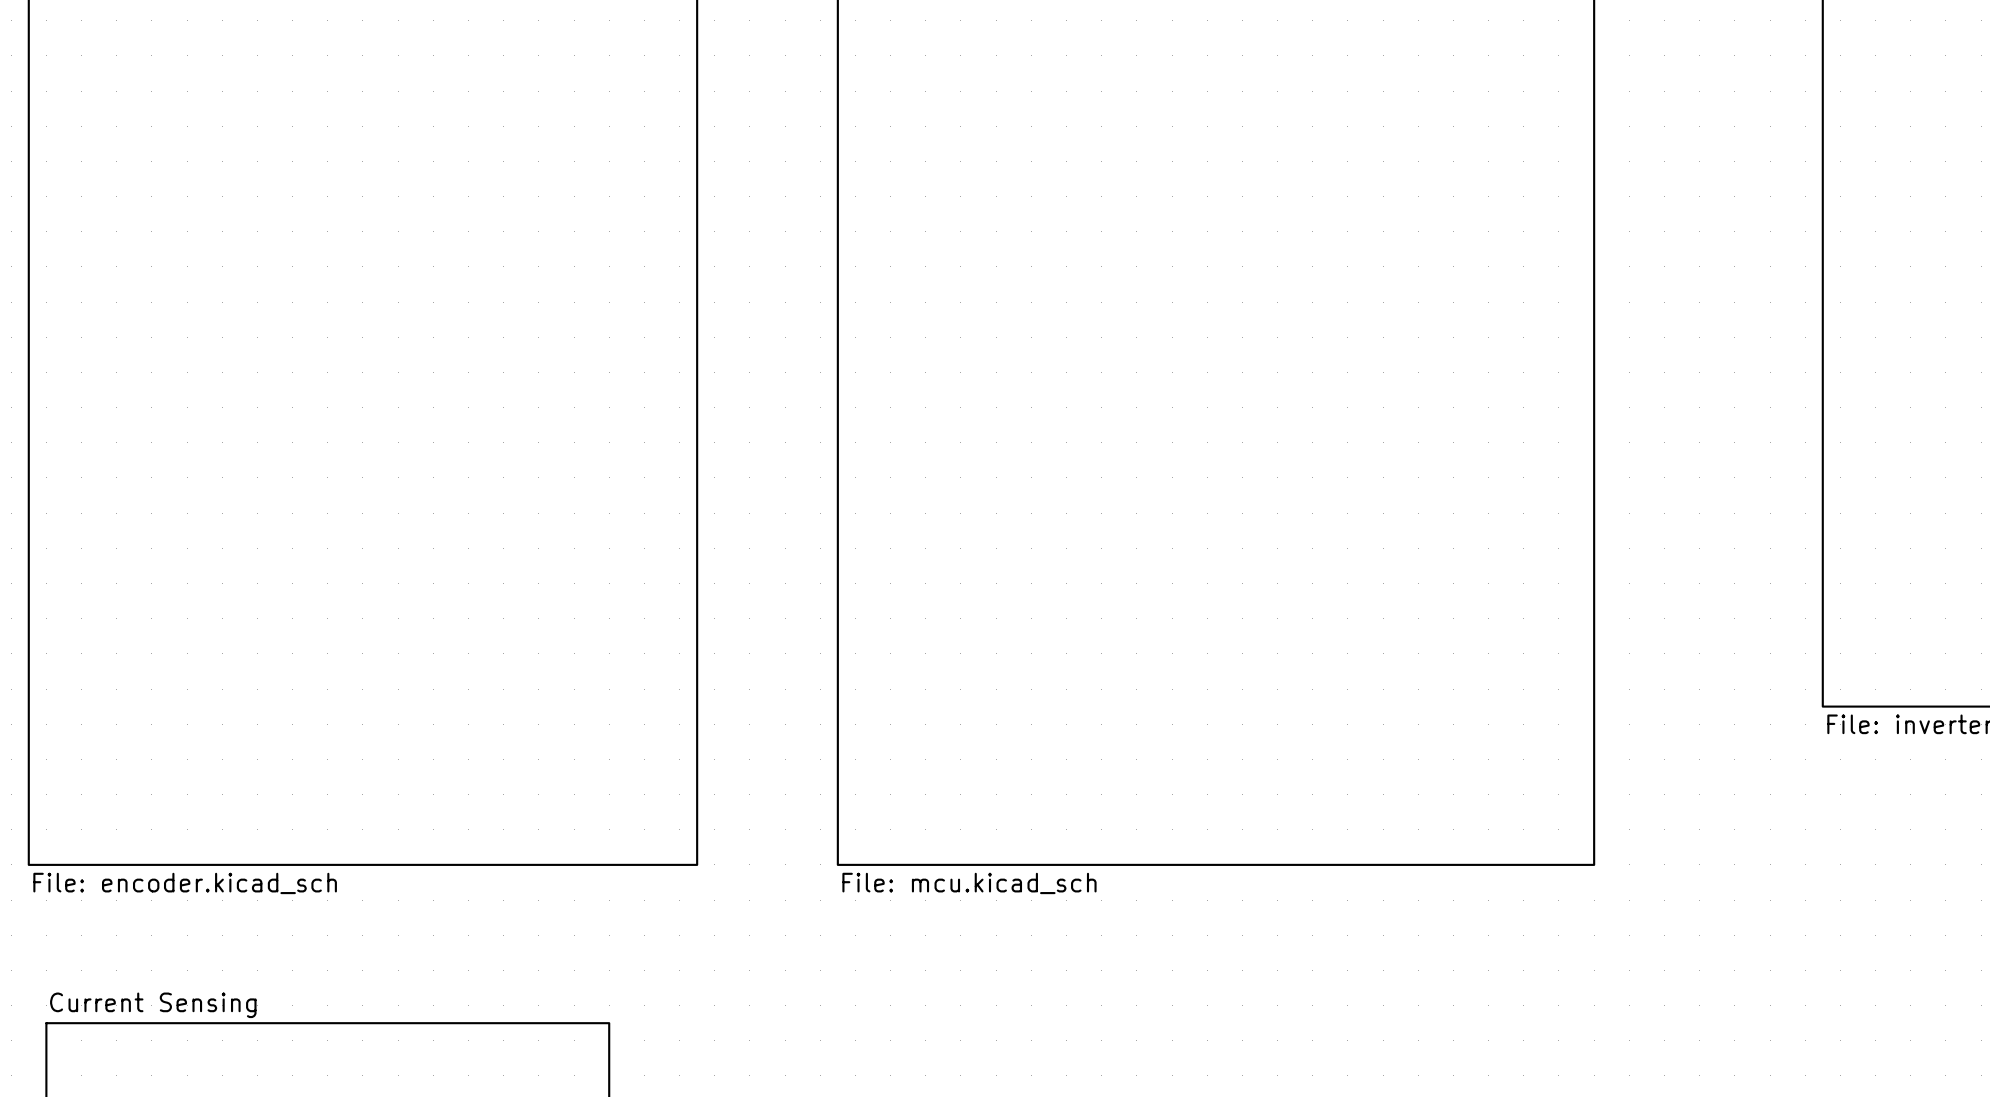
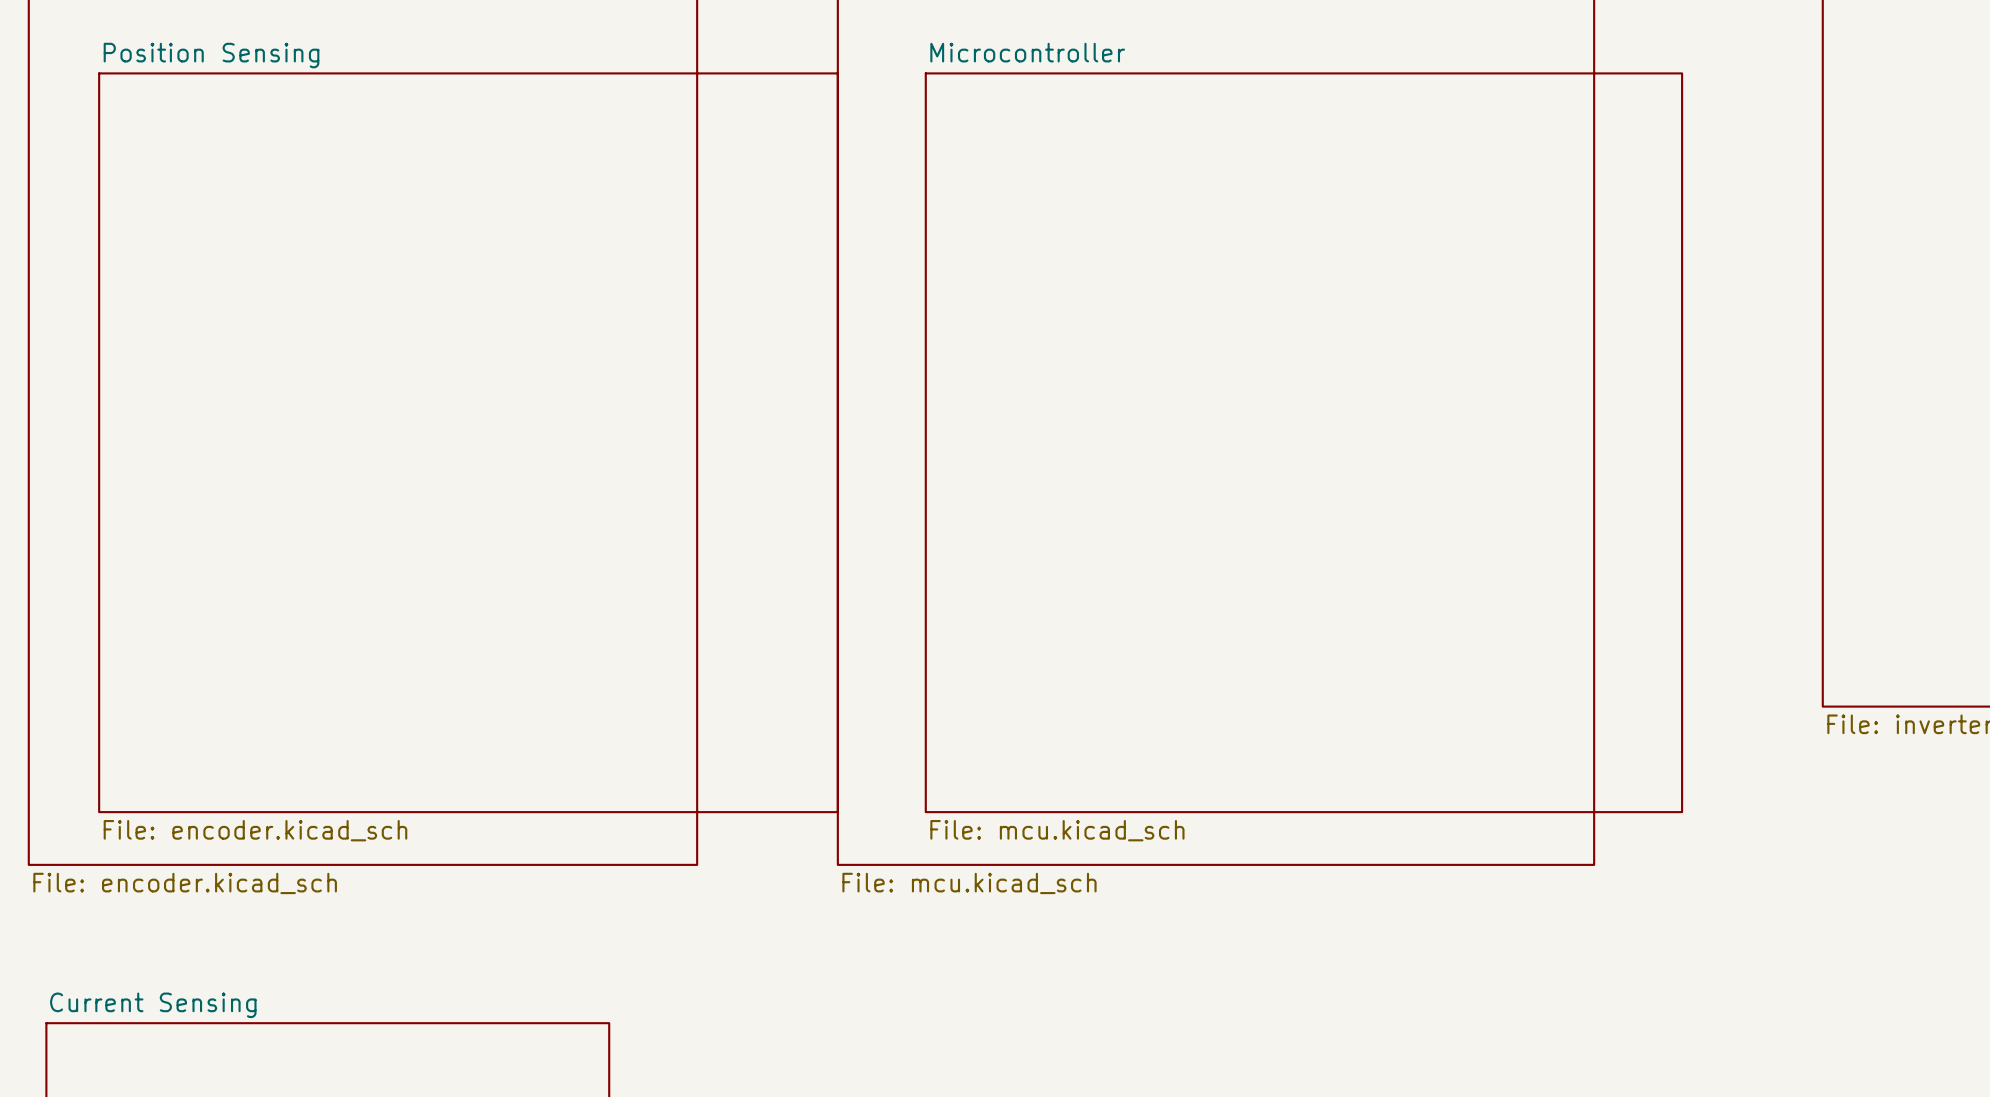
sheet Position Sensing: none -> File: encoder.kicad_sch (468, 442)
sheet Microcontroller: none -> File: mcu.kicad_sch (1303, 442)

